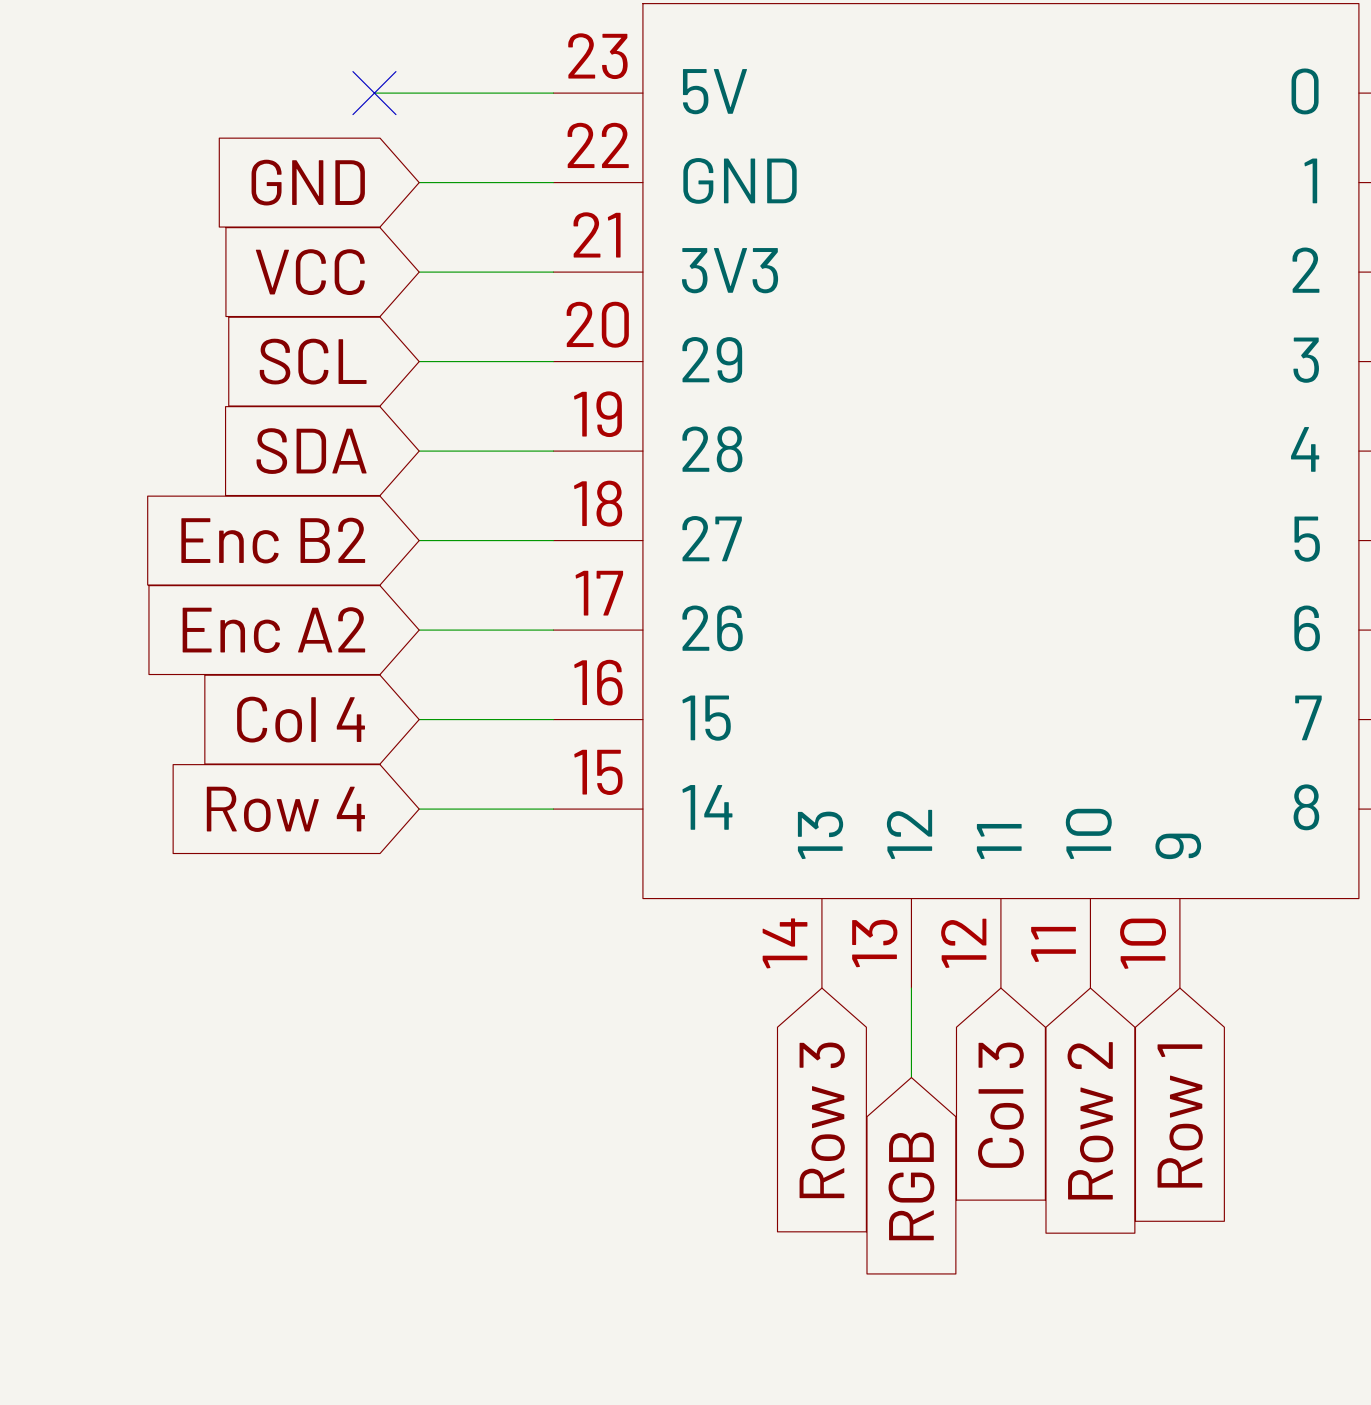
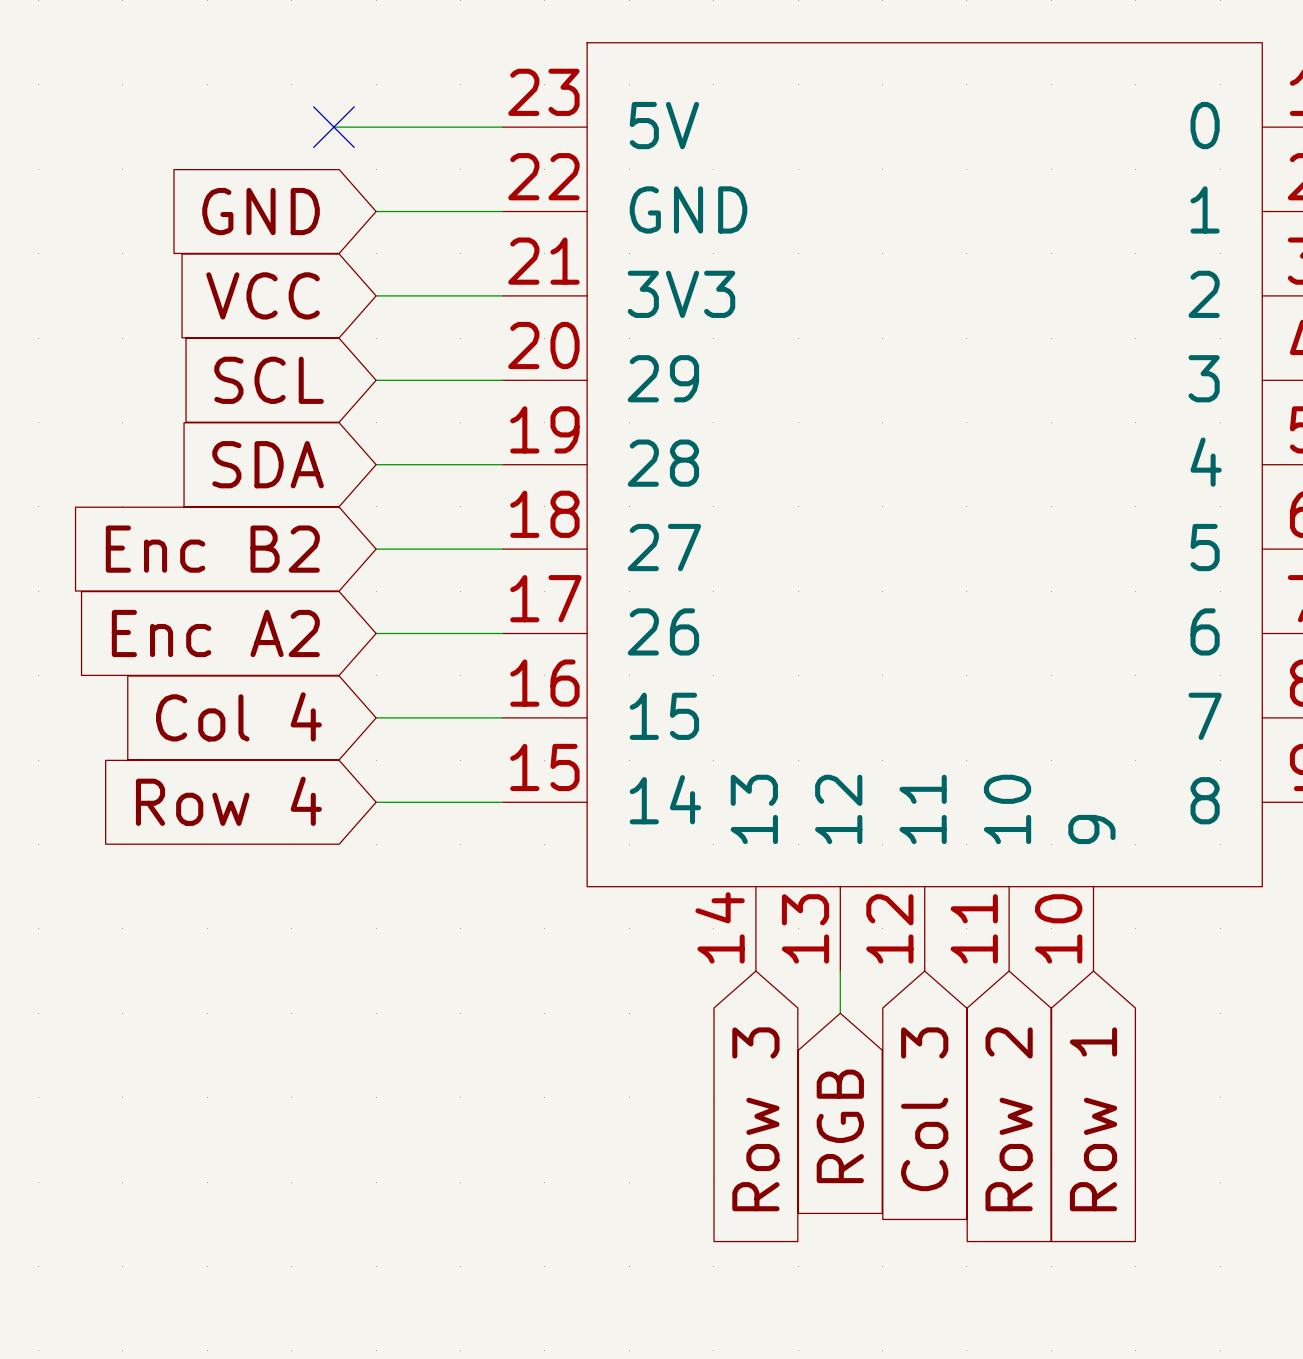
wire: (911, 1032) (911, 1077) -> none
global label position: RGB (911, 1186) -> RGB (840, 1126)

